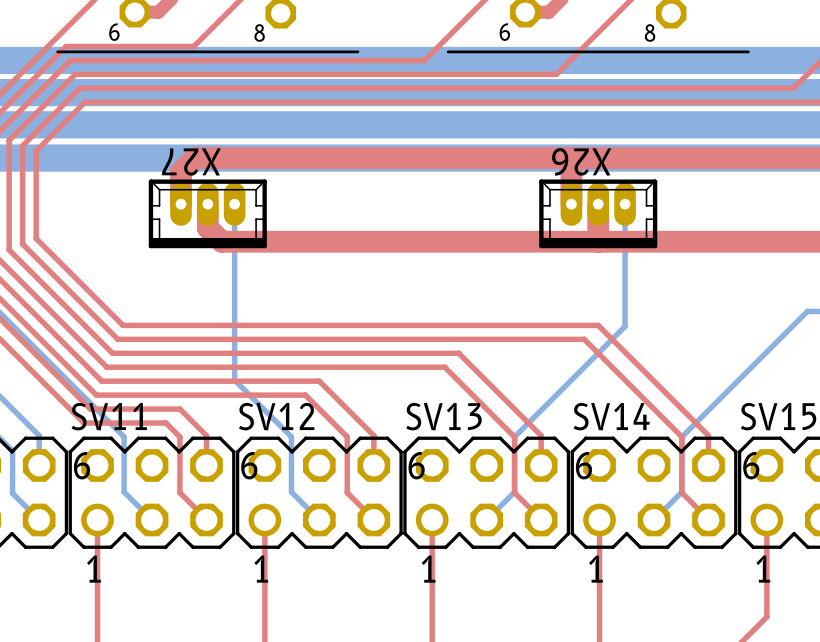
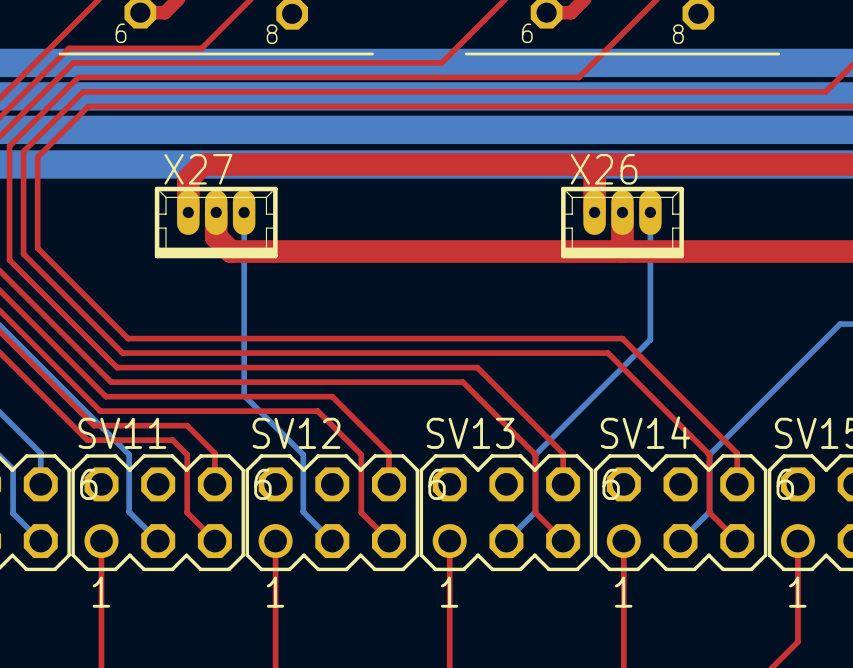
X26 name rotation: 0° (581, 161) -> 180° (604, 169)
X27 name rotation: 0° (191, 162) -> 180° (198, 169)

